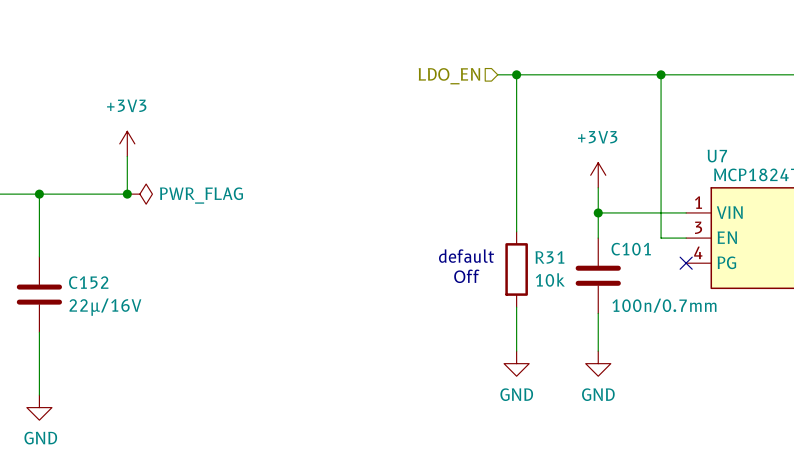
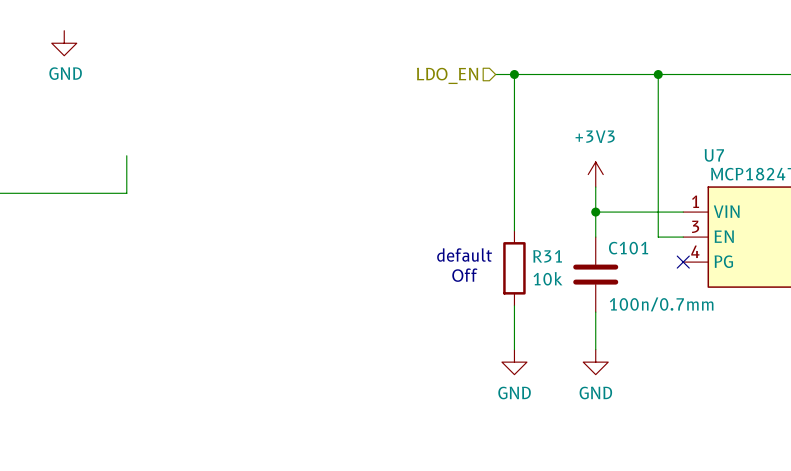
power symbol: none -> GND (64, 43)
power symbol: +3V3 (127, 143) -> none
wire: (39, 194) (39, 256) -> none
junction: (39, 194) -> none
junction: (127, 194) -> none
power symbol: PWR_FLAG (139, 194) -> none
C152: 22µ/16V (39, 294) -> none
wire: (39, 332) (39, 395) -> none
power symbol: GND (39, 407) -> none

